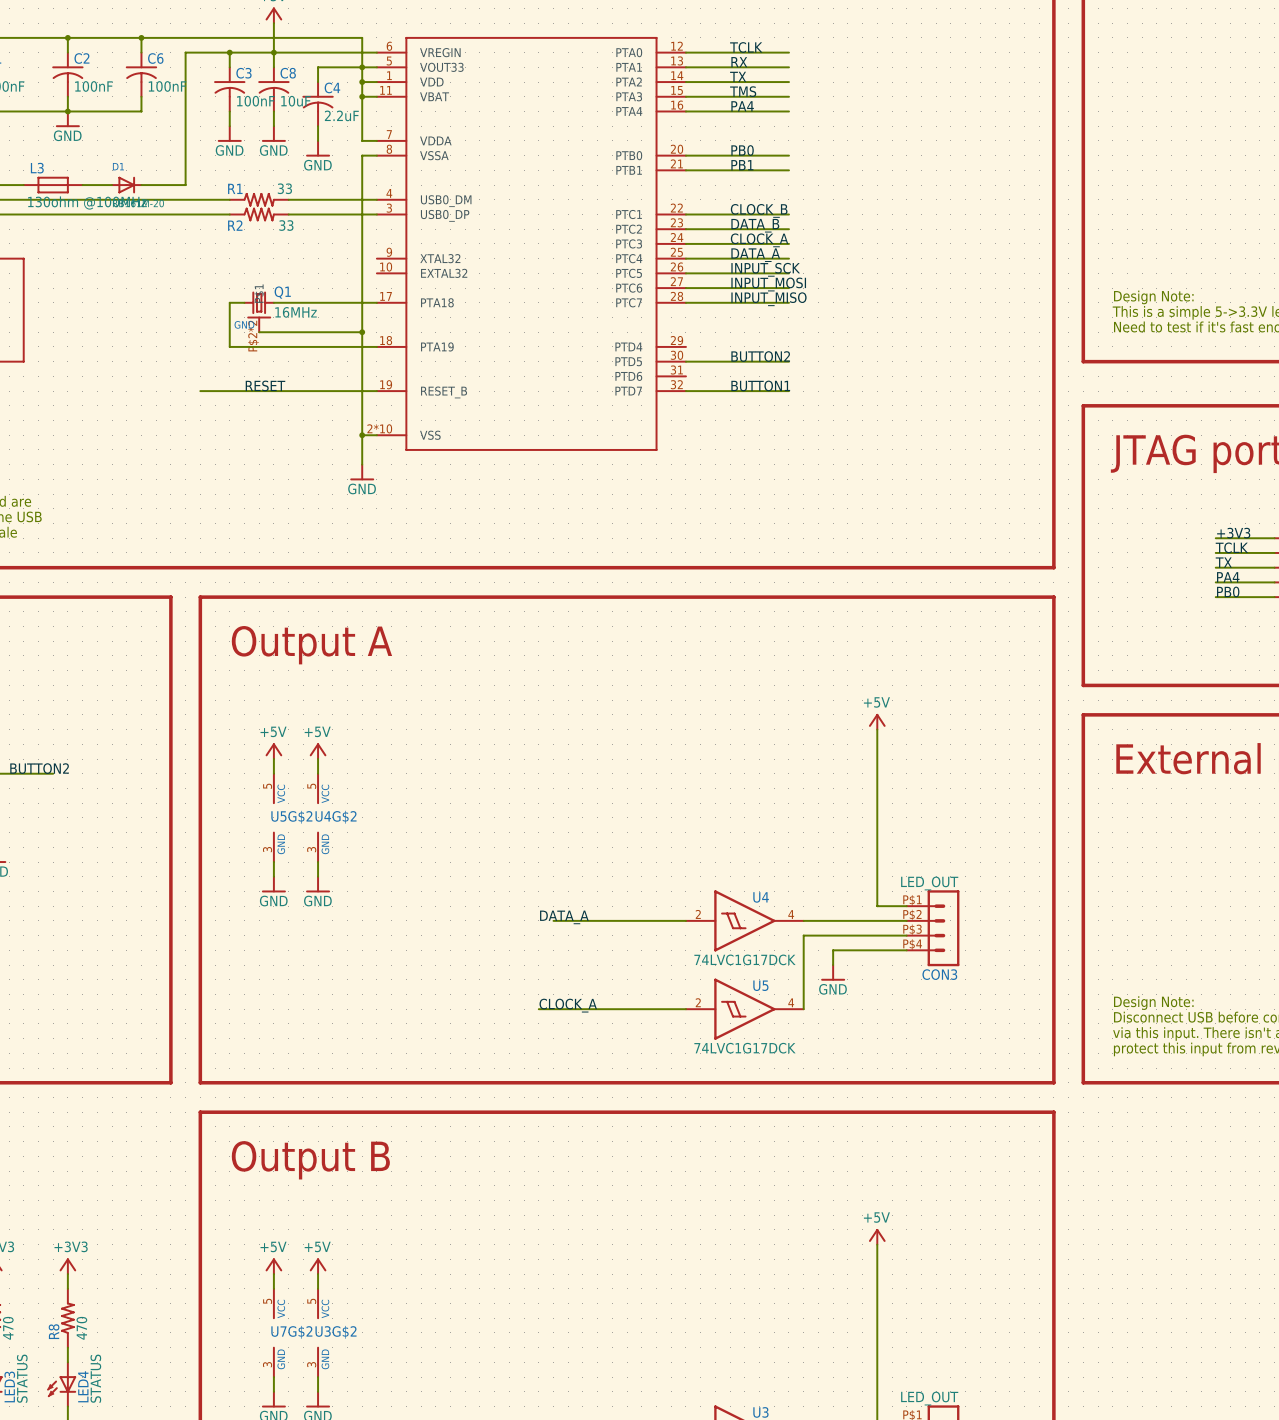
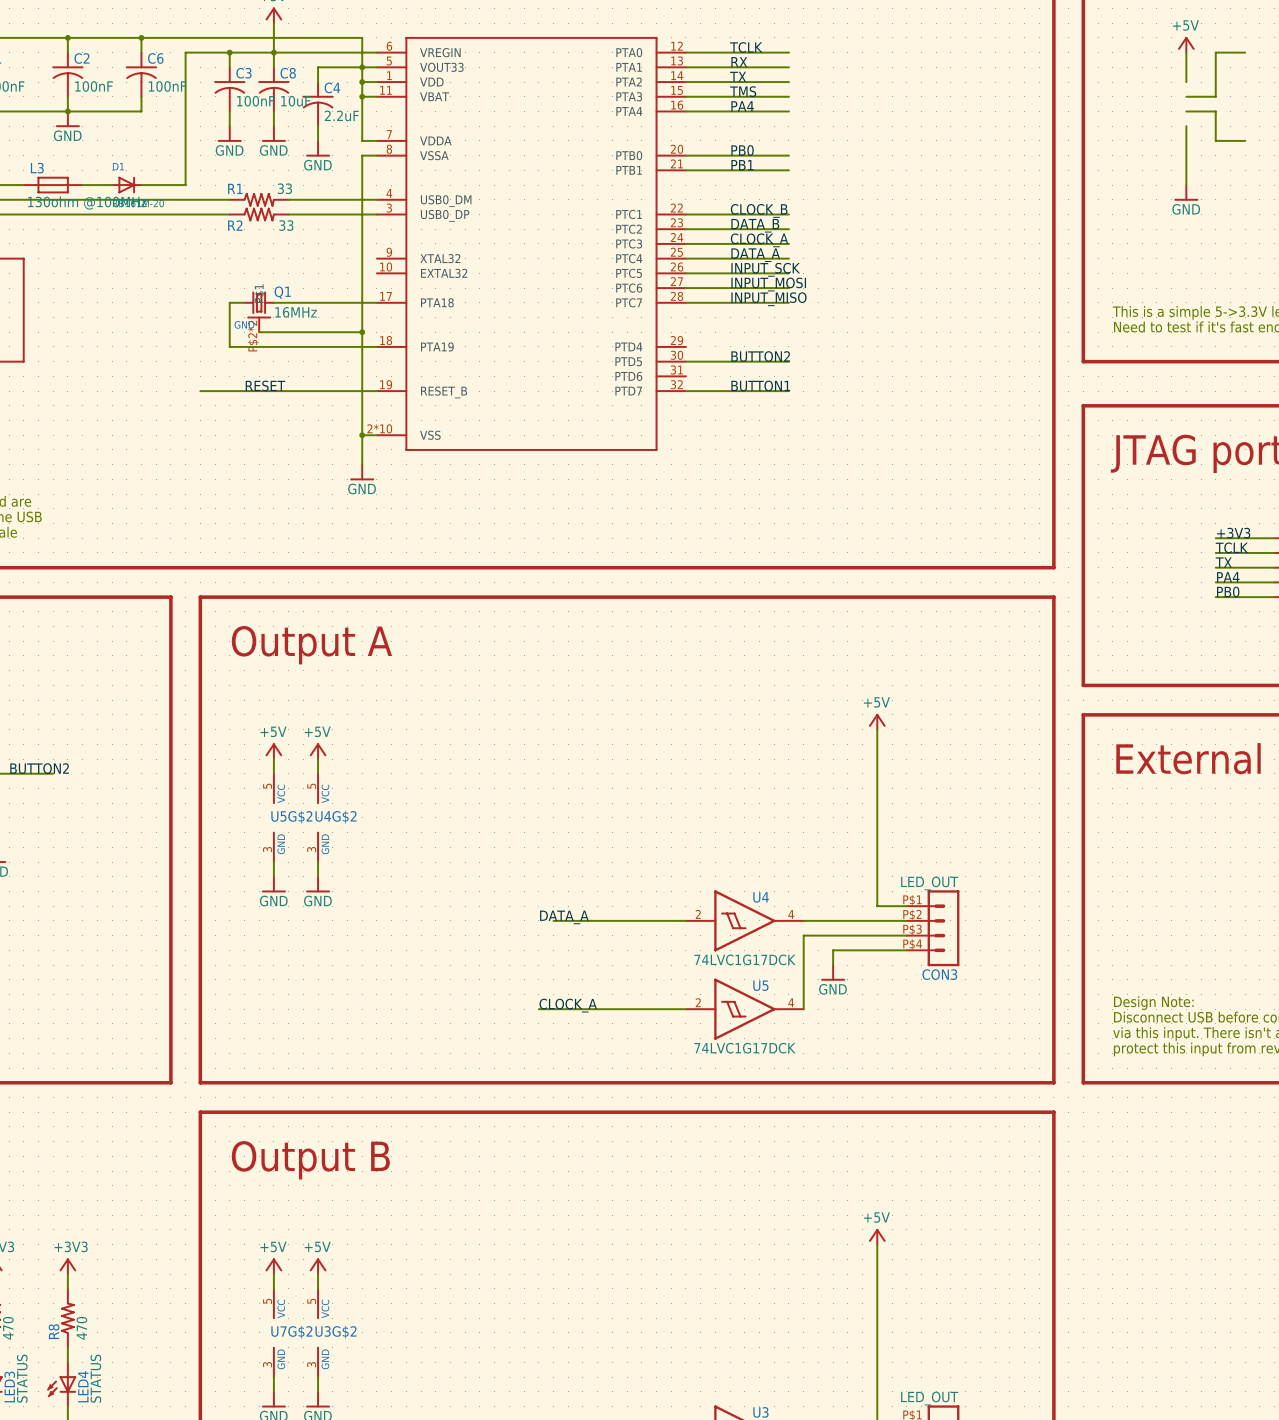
power symbol: none -> +5V (1186, 44)
wire: none -> (1186, 52) (1186, 82)
wire: none -> (1245, 52) (1215, 52) (1215, 96) (1186, 96)
wire: none -> (1186, 111) (1215, 111) (1215, 140) (1245, 140)
wire: none -> (1186, 126) (1186, 185)
power symbol: none -> GND (1186, 192)
text: Design Note: (1153, 297) -> none

